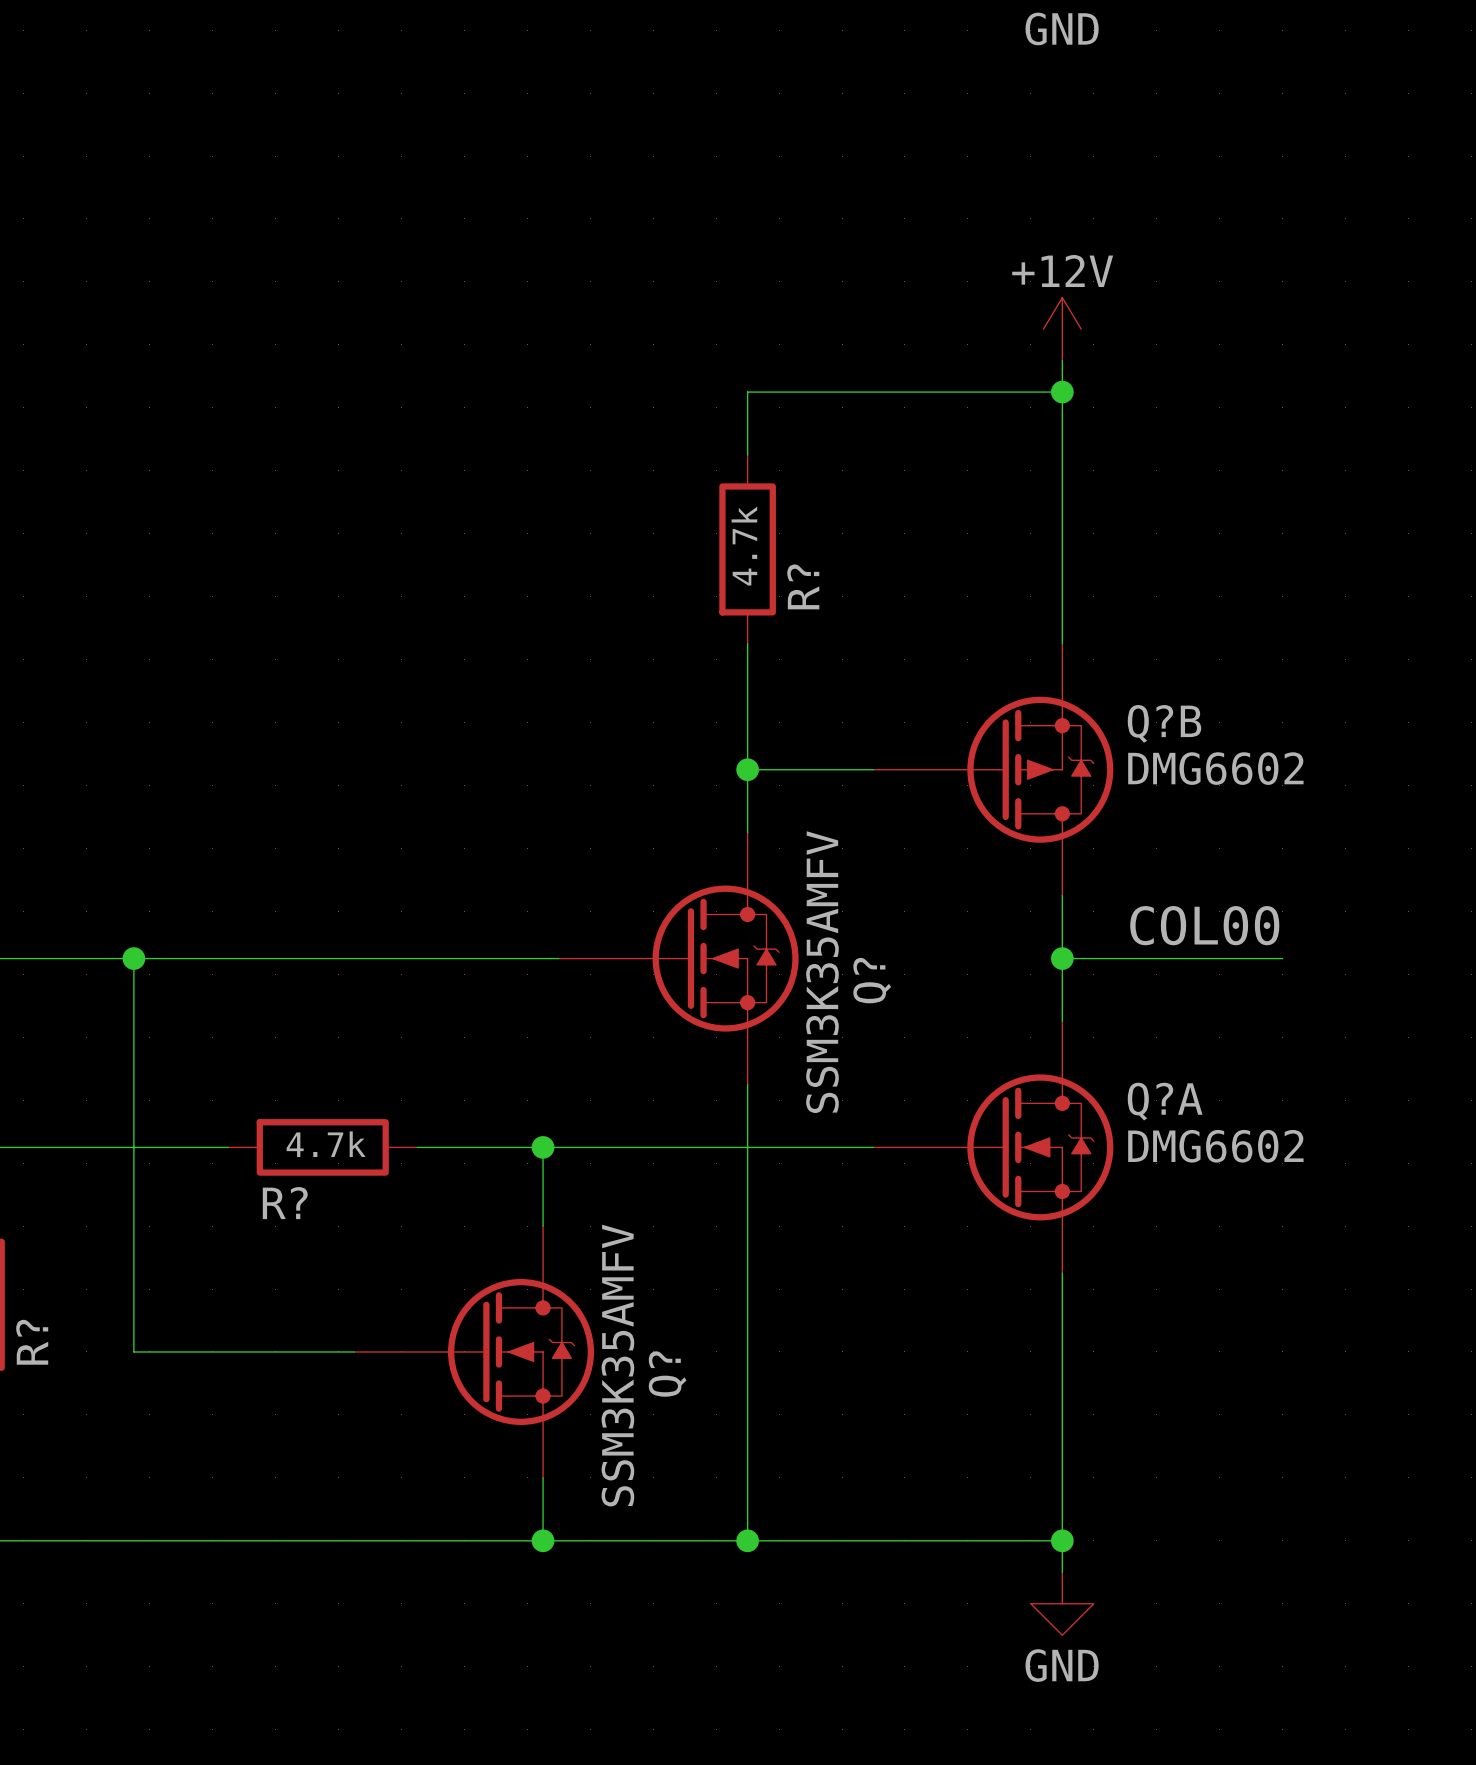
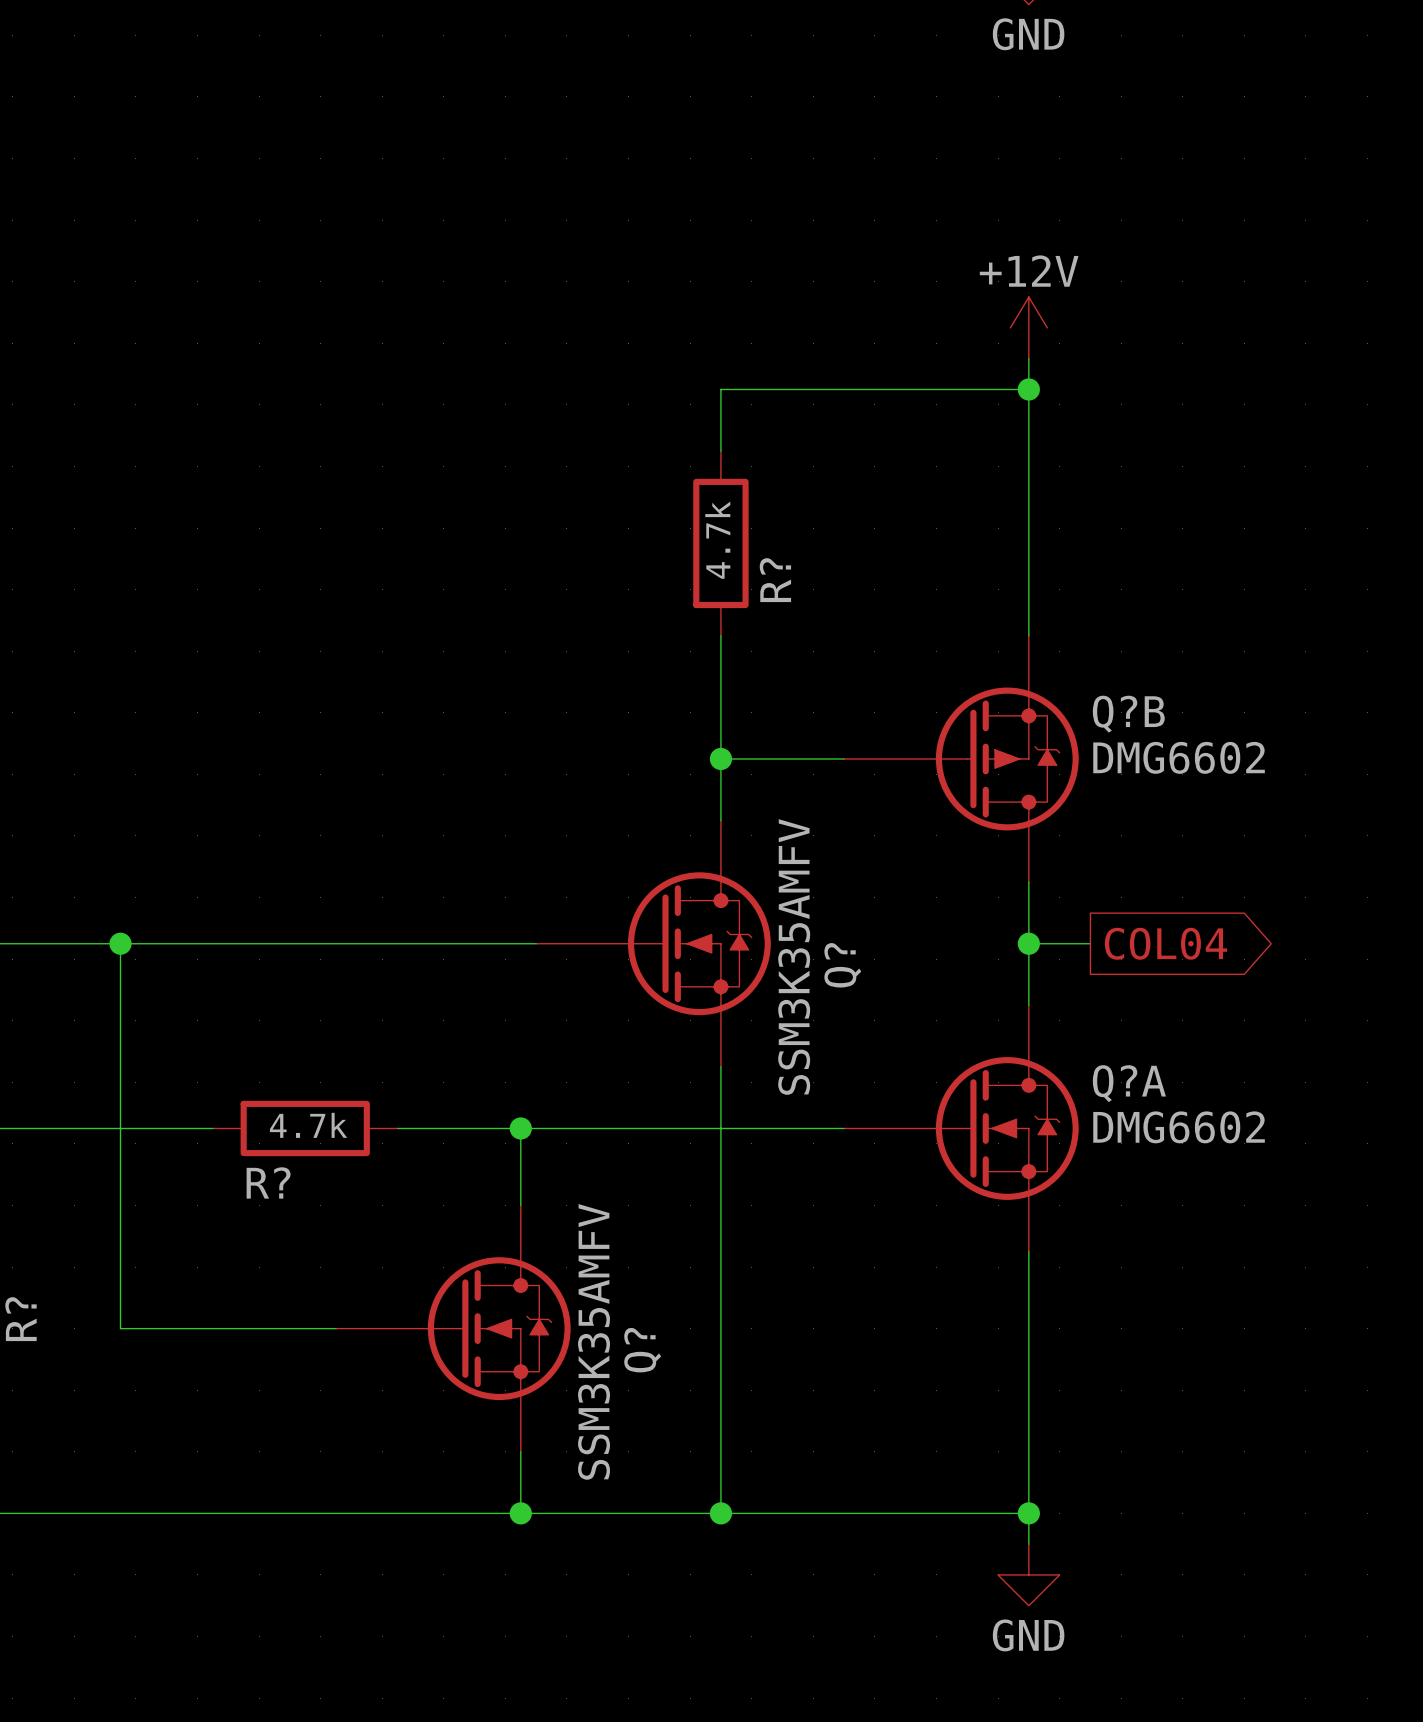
label: COL00 (1204, 925) -> none
wire: (1125, 958) (1282, 958) -> none
global label: none -> COL04 (1165, 943)

